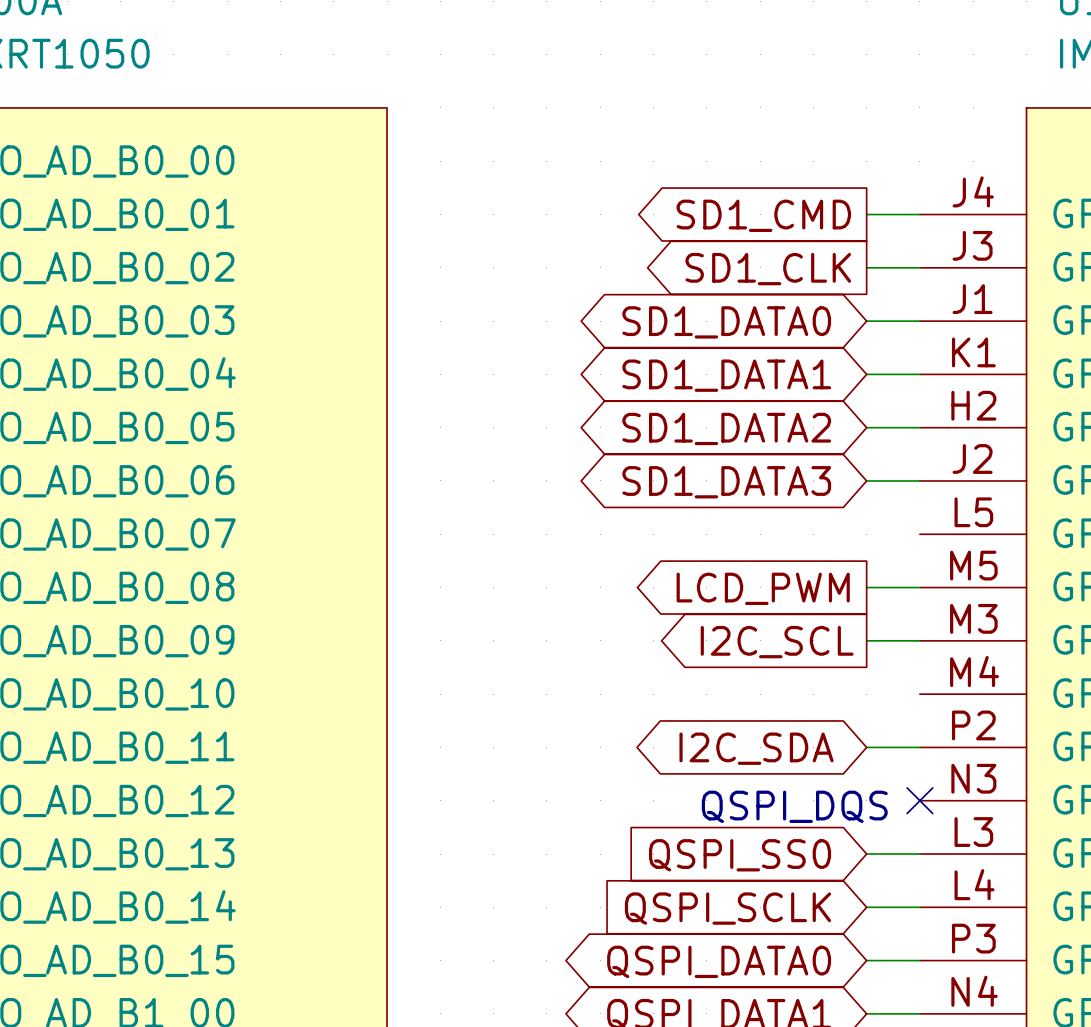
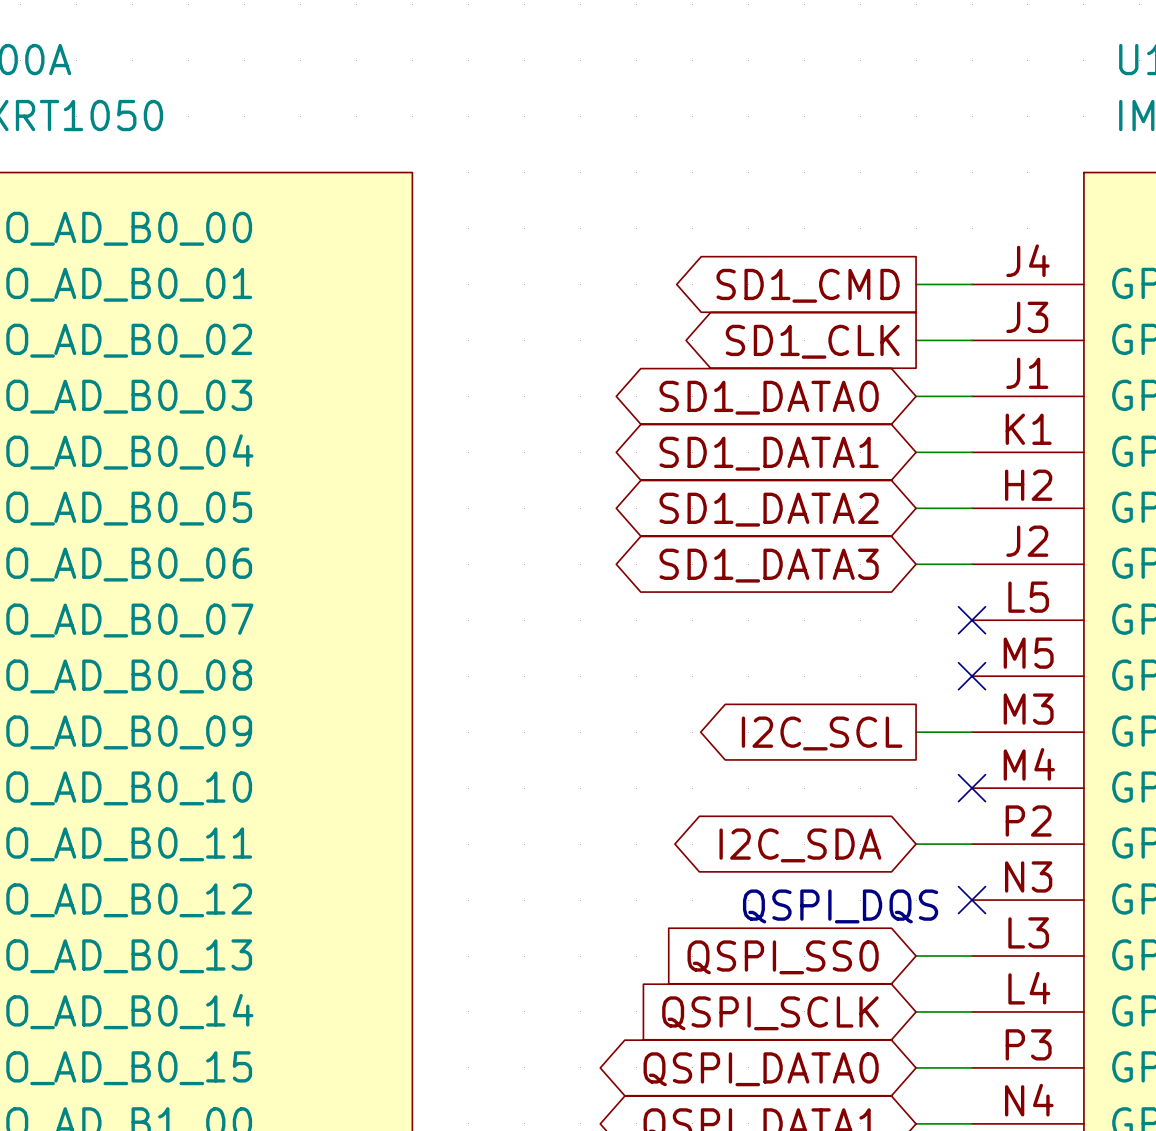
no-connect mark: none -> (972, 620)
wire: (866, 587) (919, 587) -> none
no-connect mark: none -> (972, 676)
global label: LCD_PWM (763, 588) -> none
no-connect mark: none -> (972, 788)

